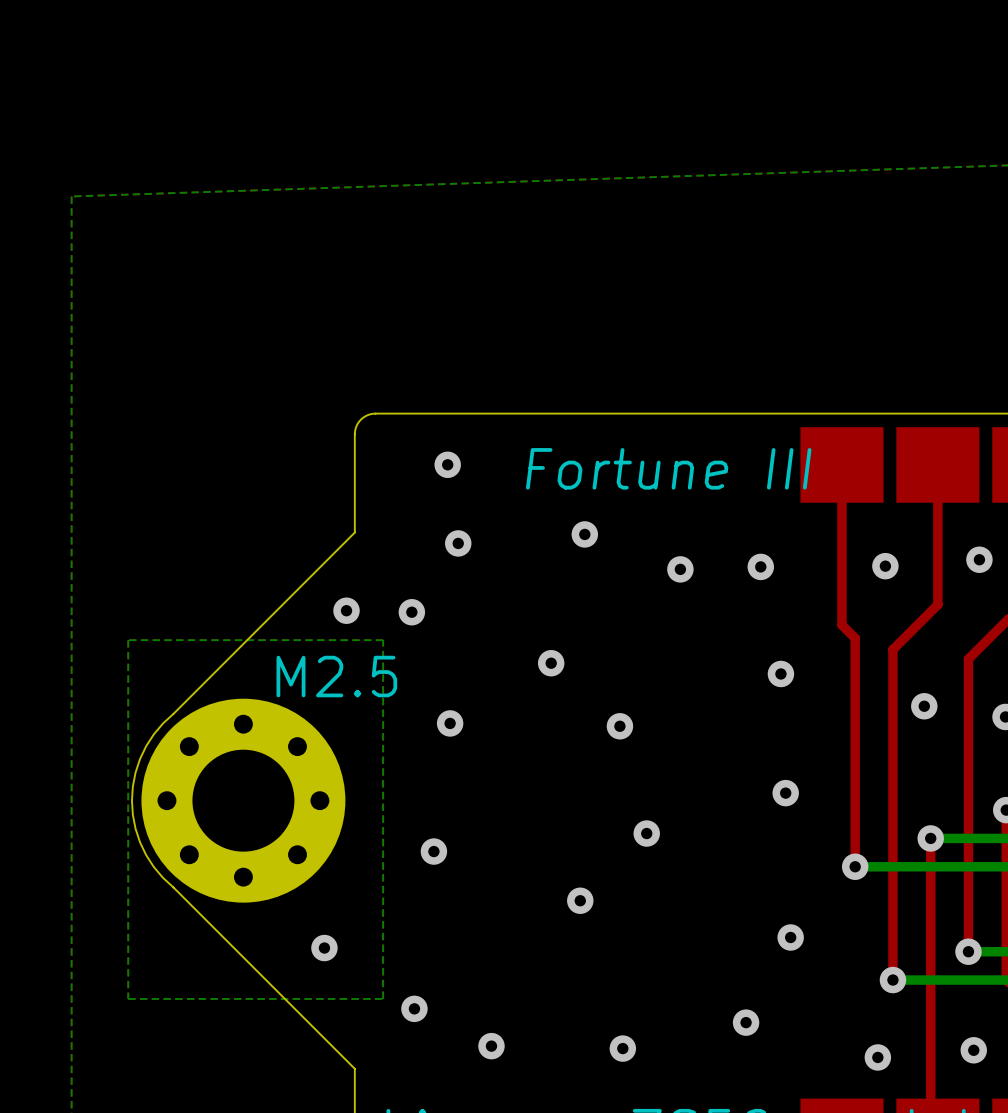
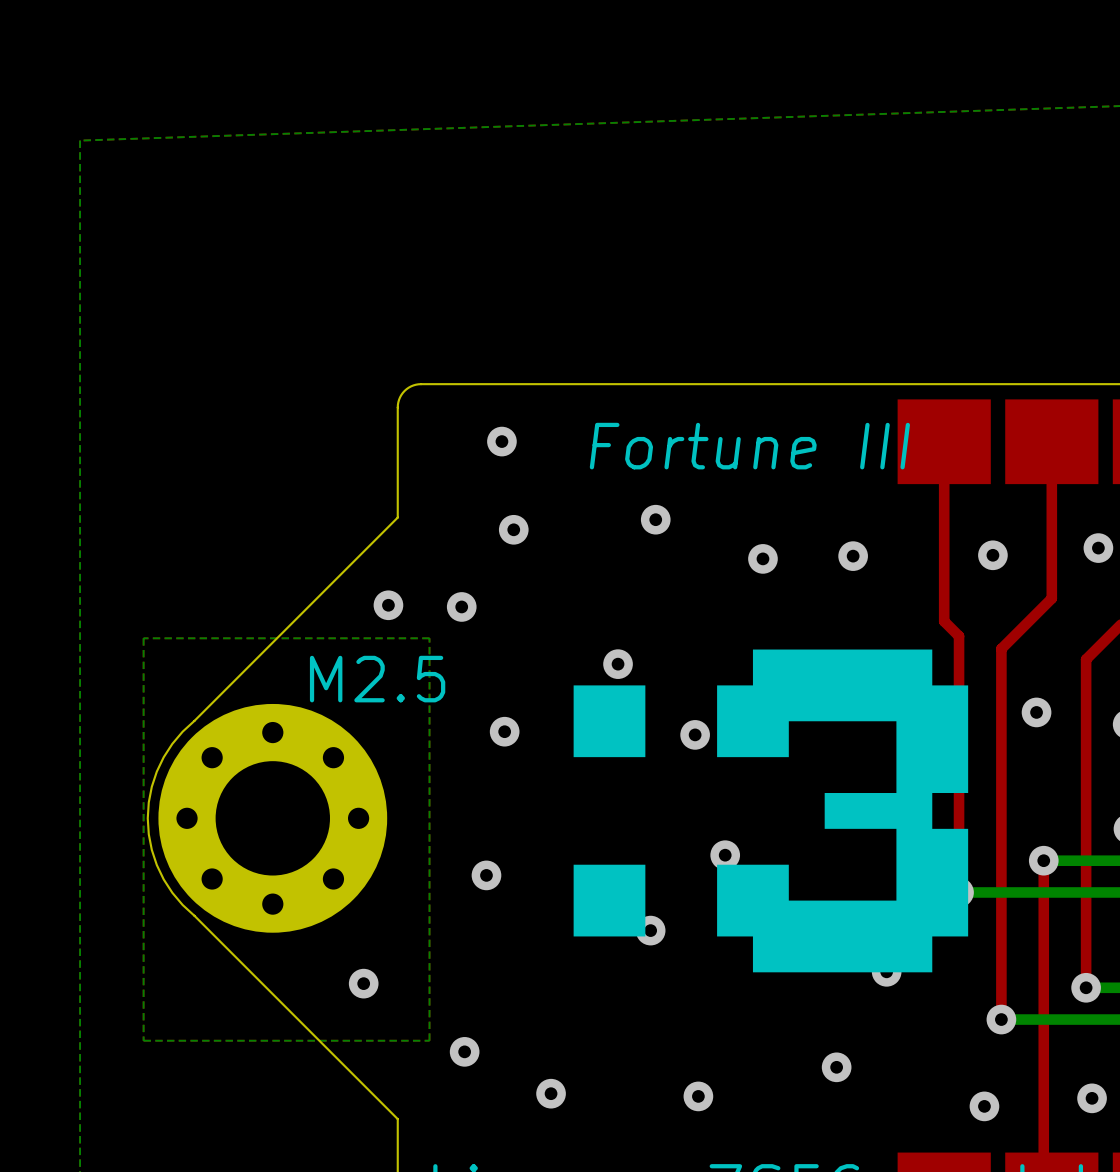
drawing: none -> [573, 649, 969, 973]

